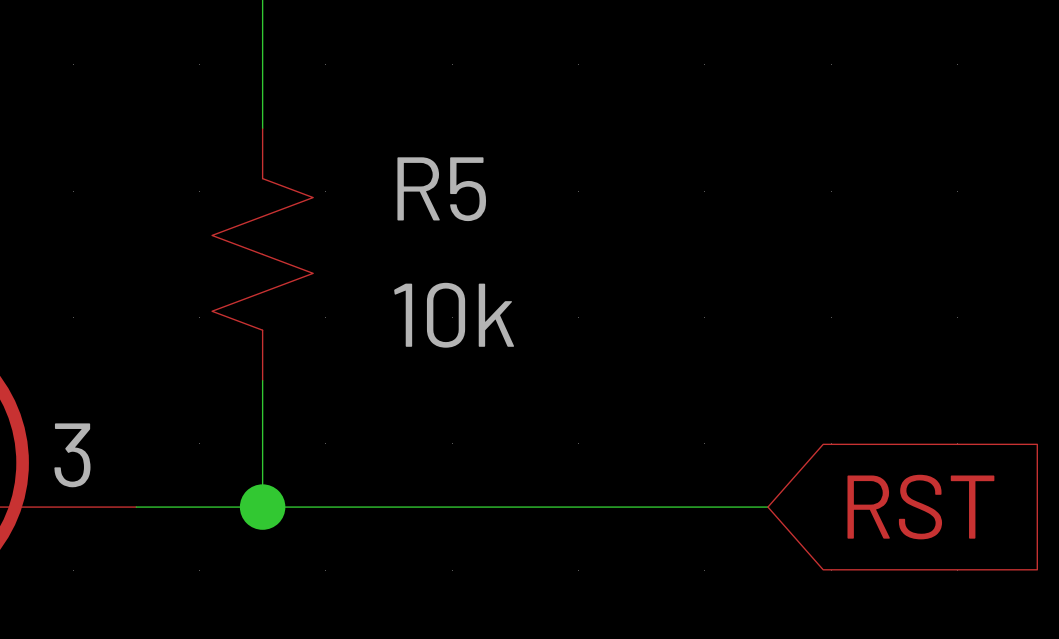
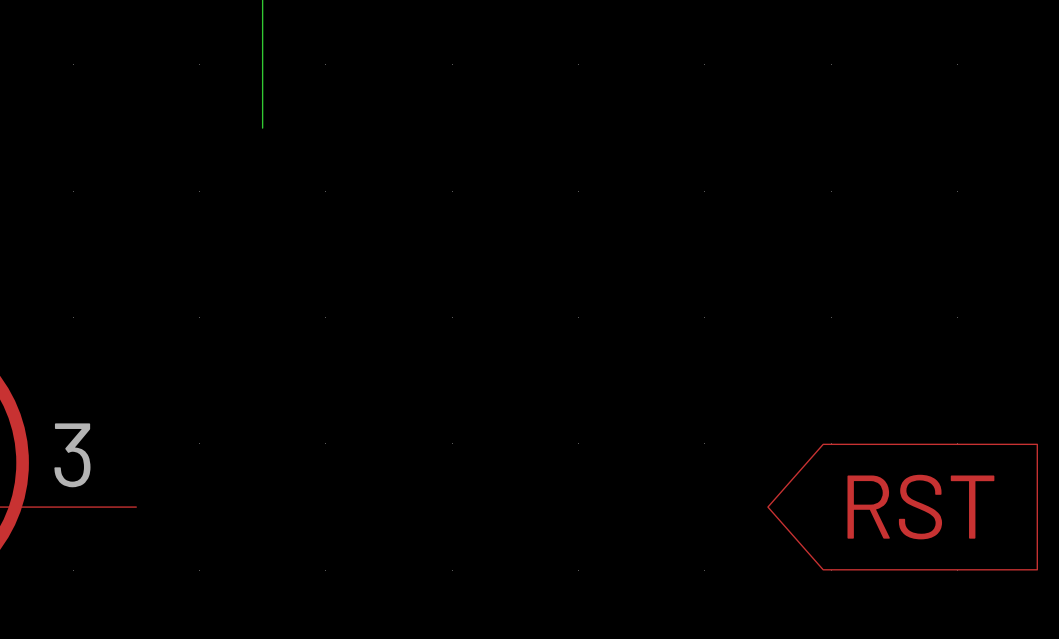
R5: 10k (262, 254) -> none
wire: (262, 380) (262, 507) -> none
wire: (136, 507) (767, 507) -> none
junction: (262, 507) -> none

